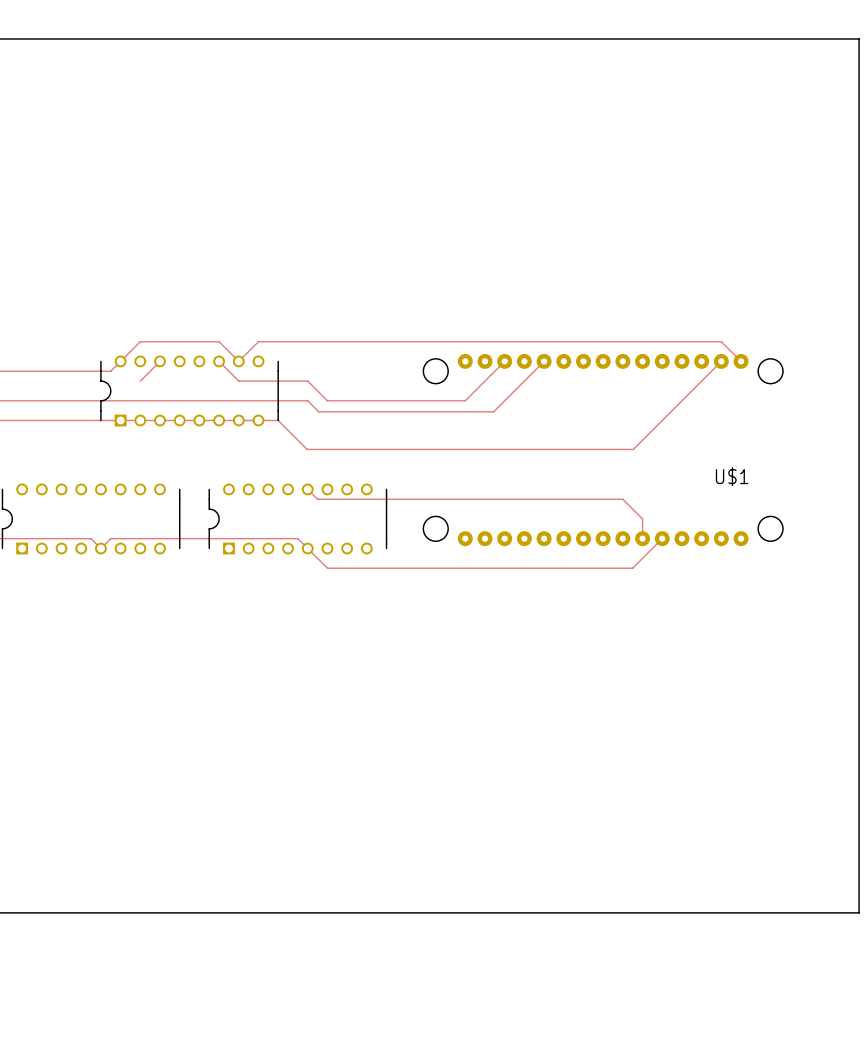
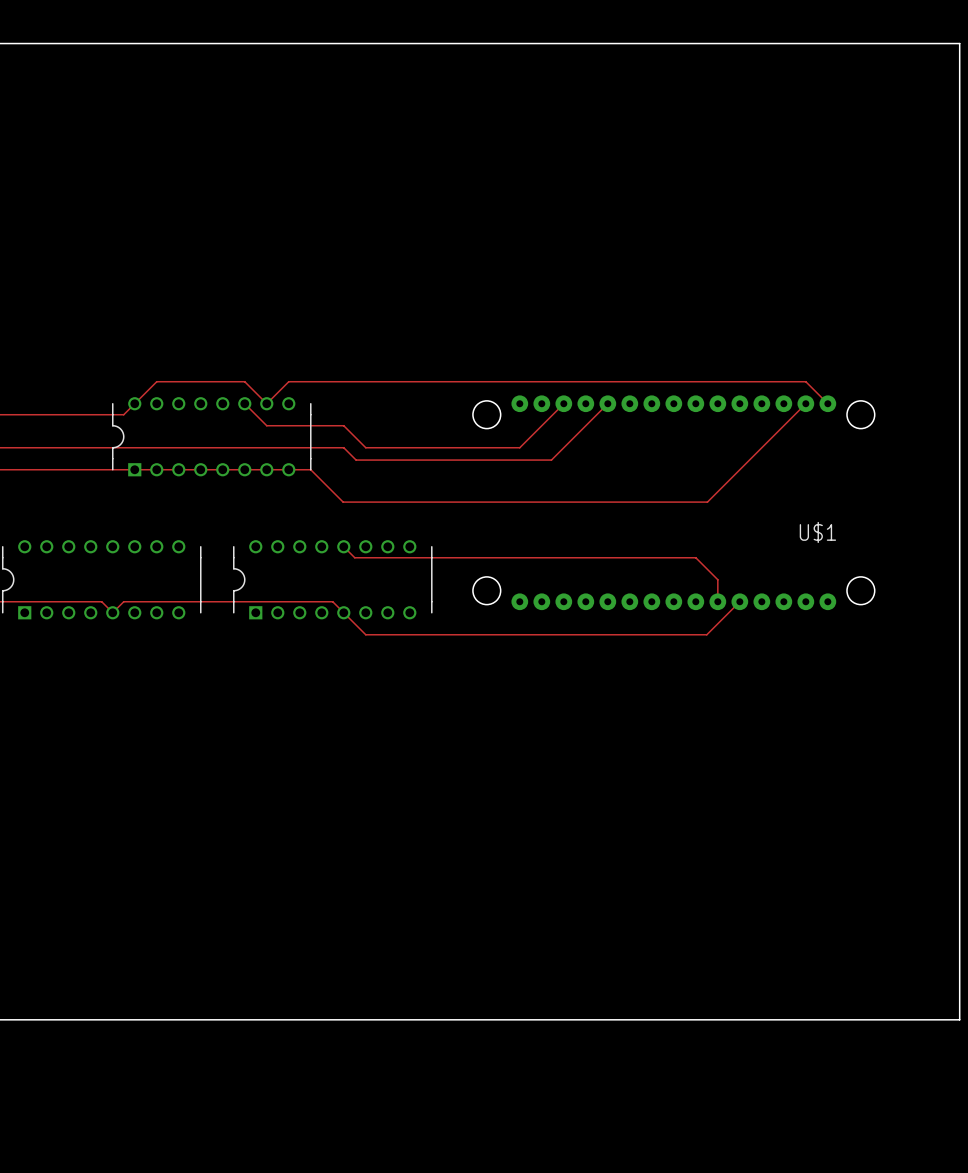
track: (160, 361) (140, 381) -> none

